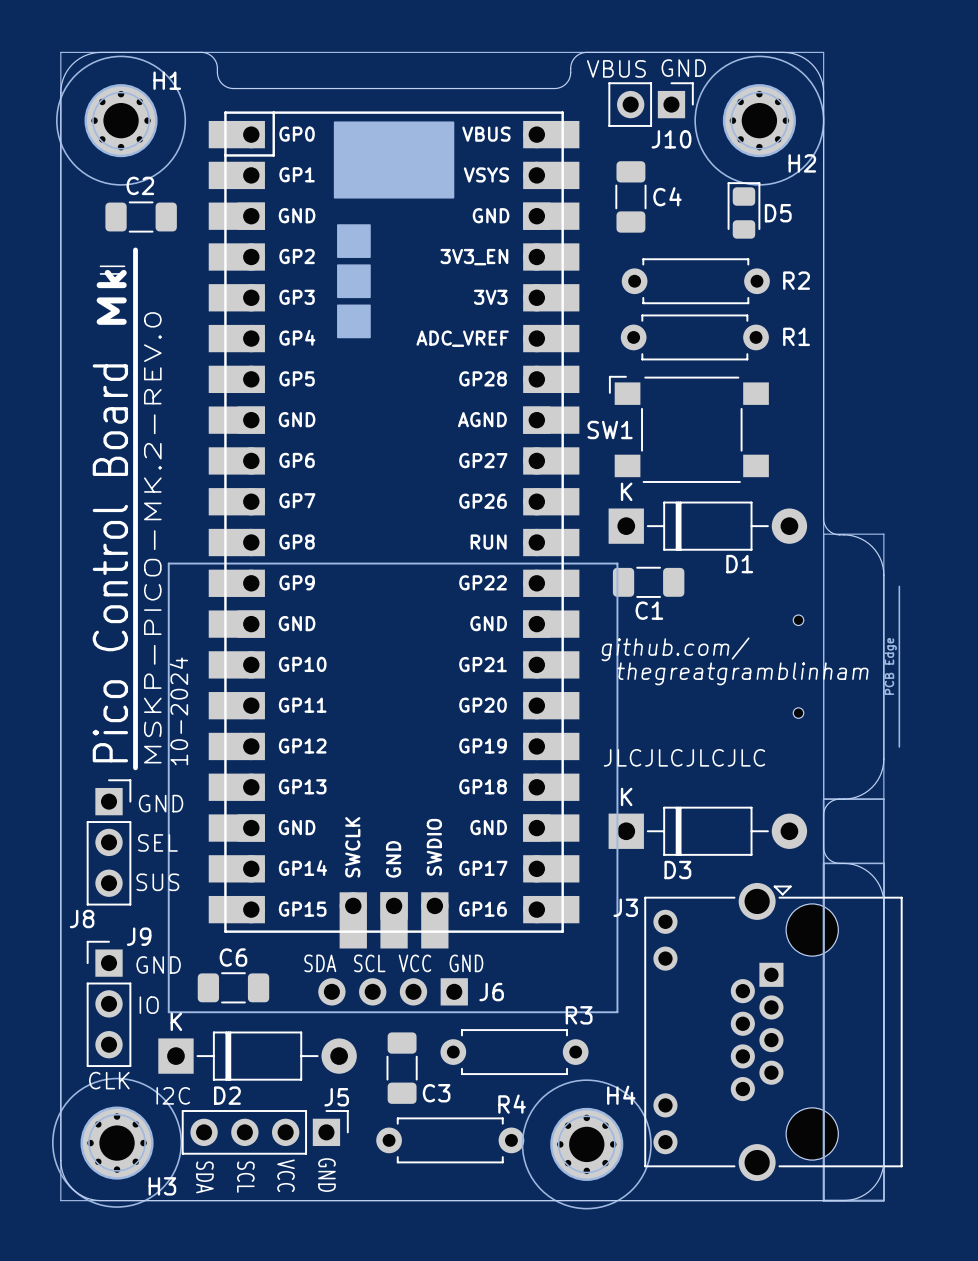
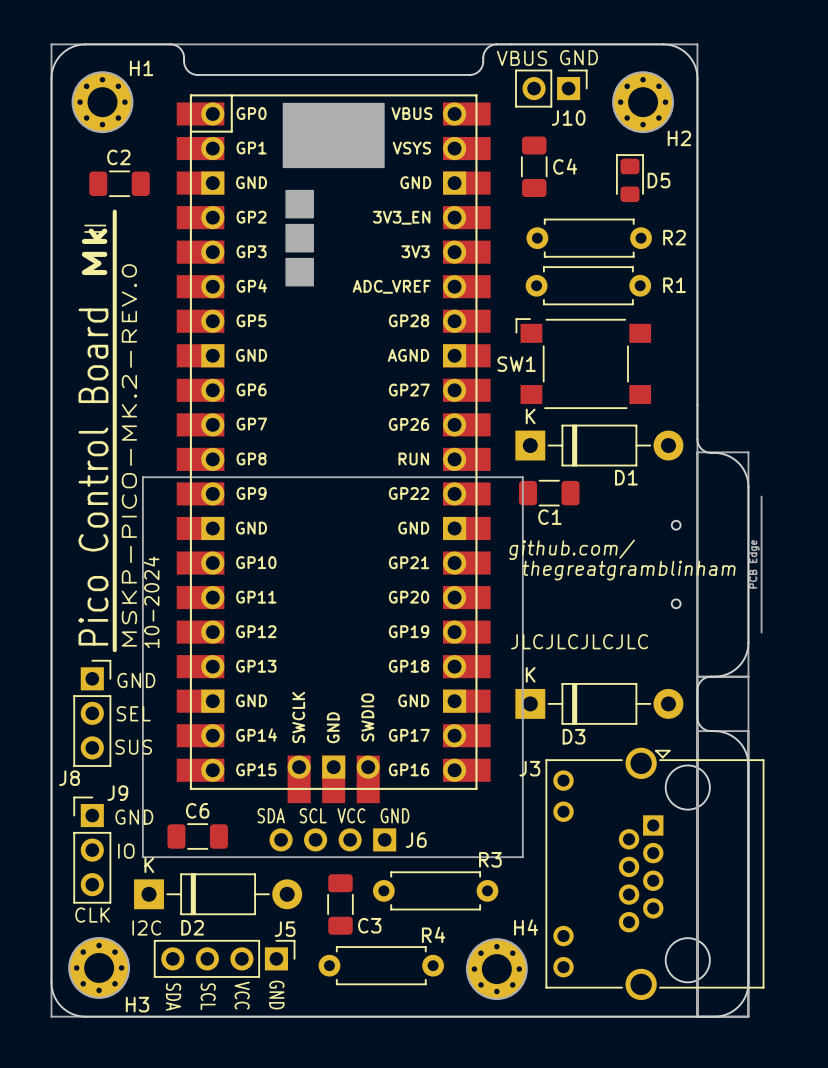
drawing: [56, 55, 187, 186] -> none
drawing: [694, 55, 825, 186] -> none
drawing: [52, 1077, 183, 1208] -> none
drawing: [521, 1079, 652, 1210] -> none

